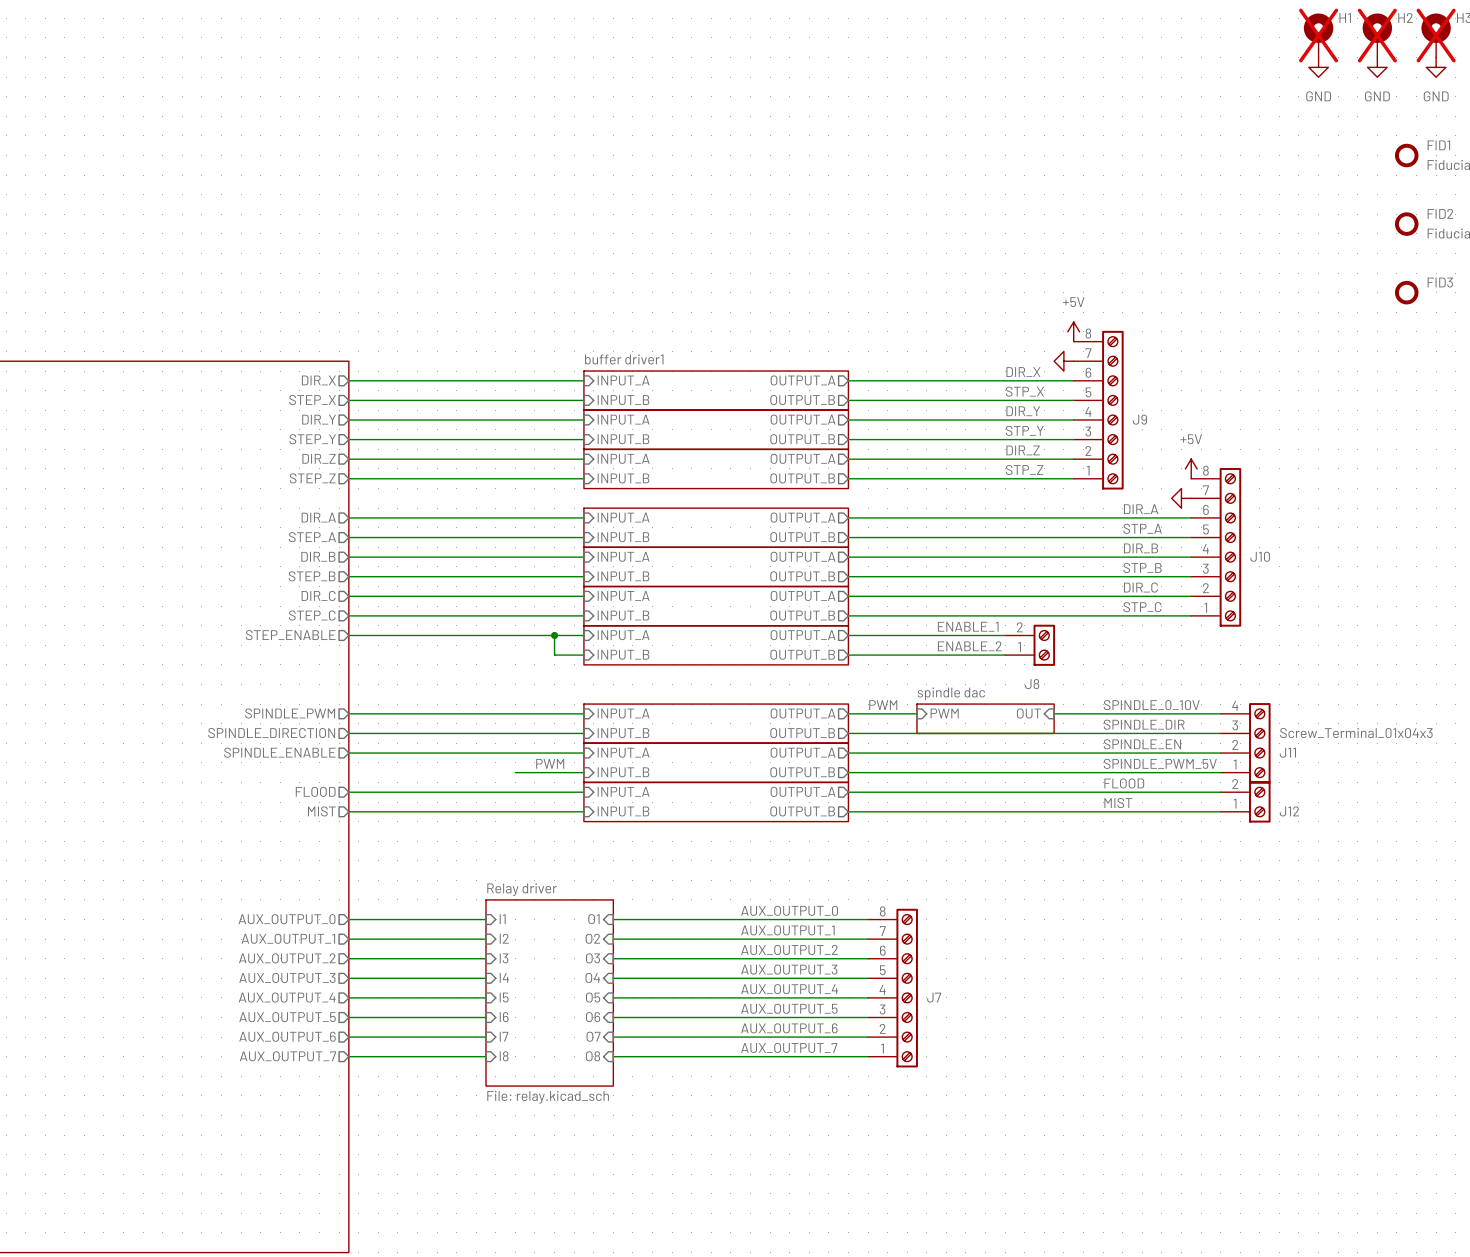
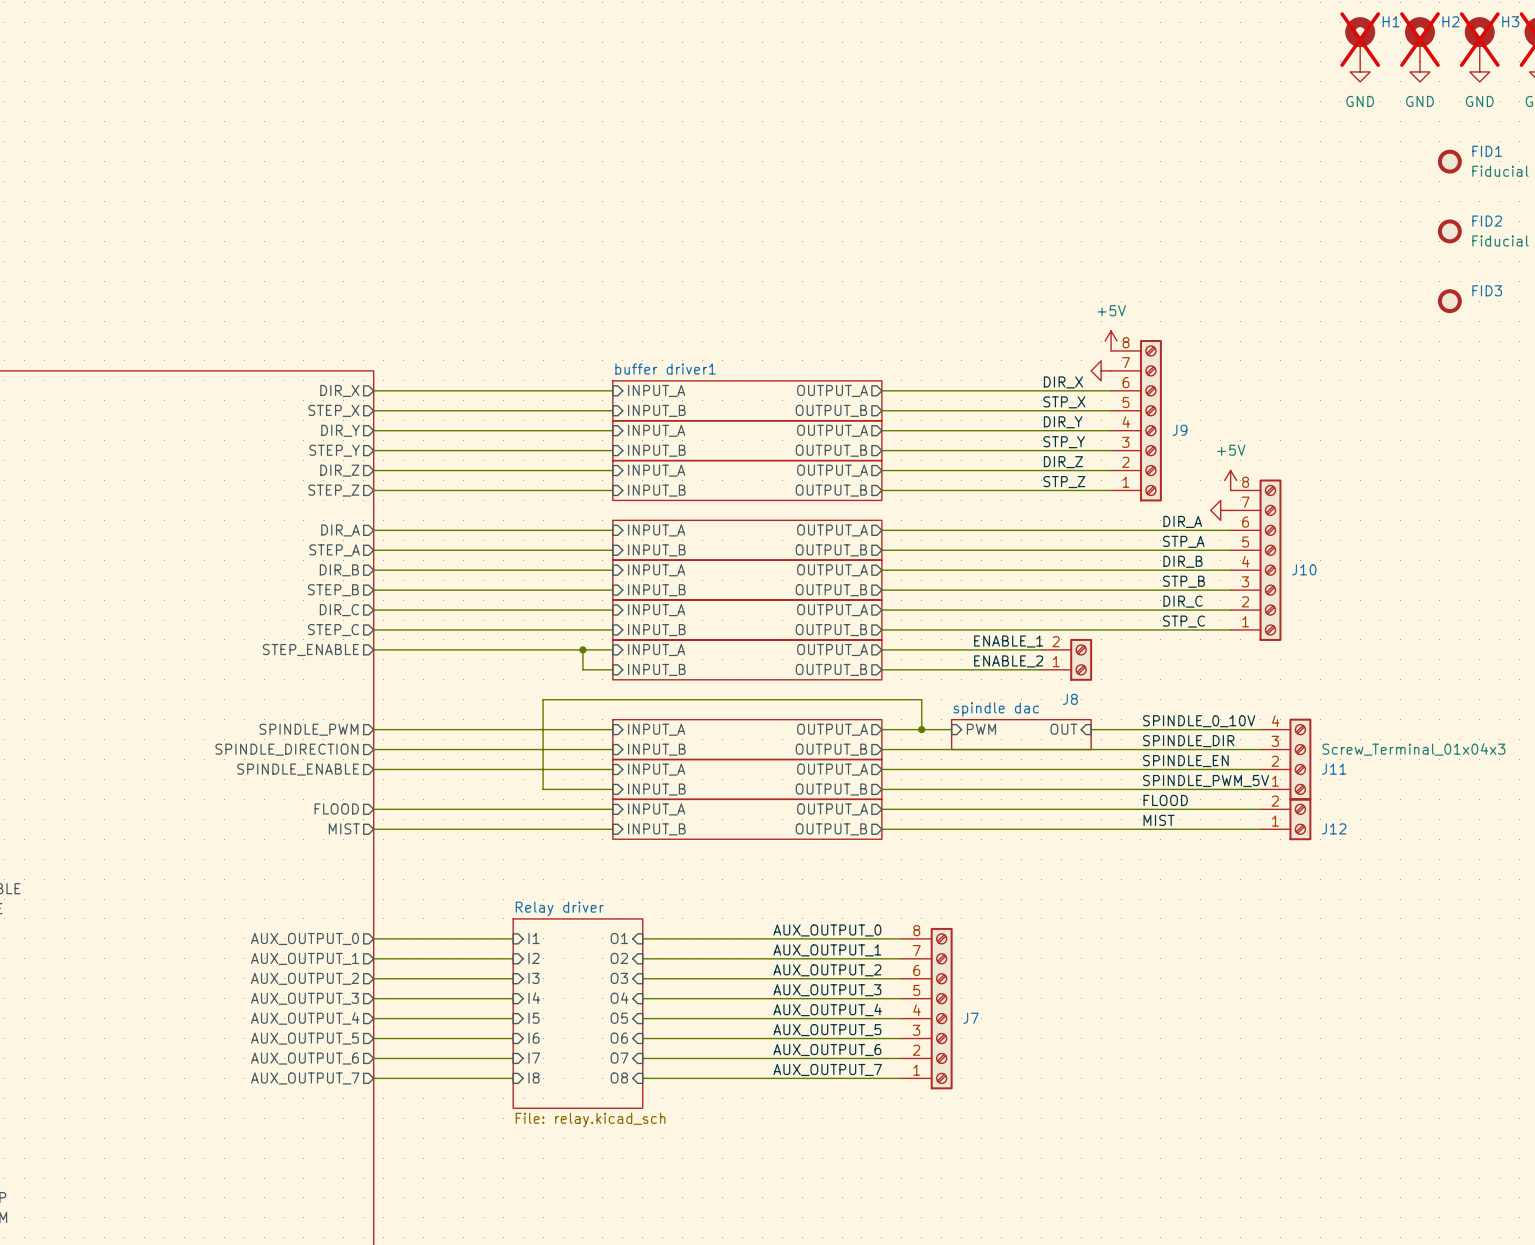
label: PWM (883, 705) -> none
wire: none -> (921, 729) (921, 699) (543, 699) (543, 789)
junction: none -> (921, 729)
label: PWM (550, 763) -> none

